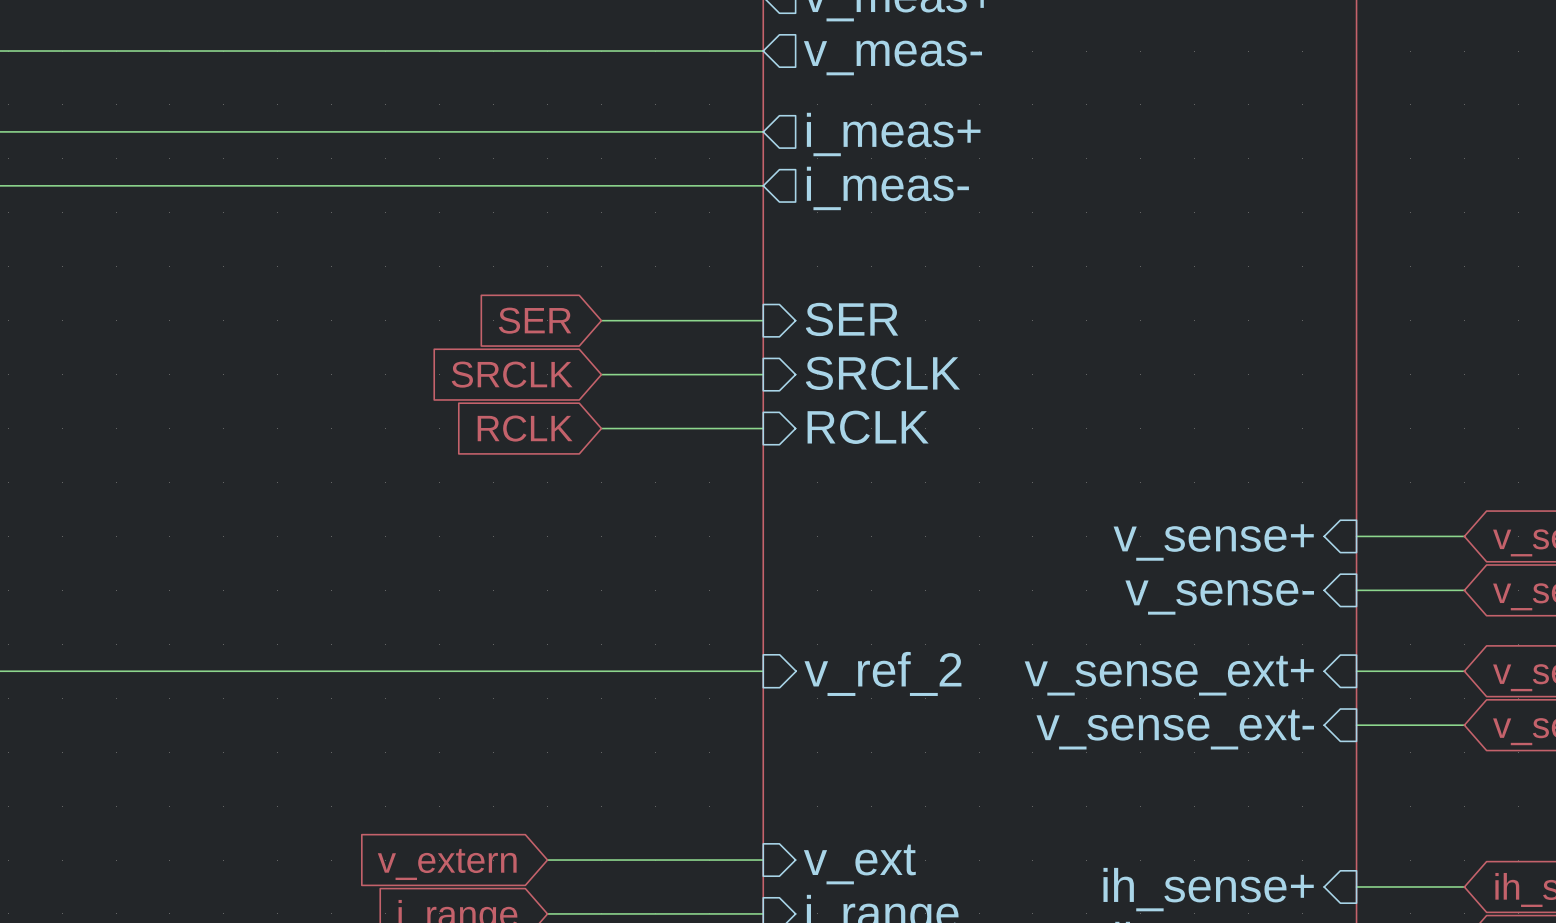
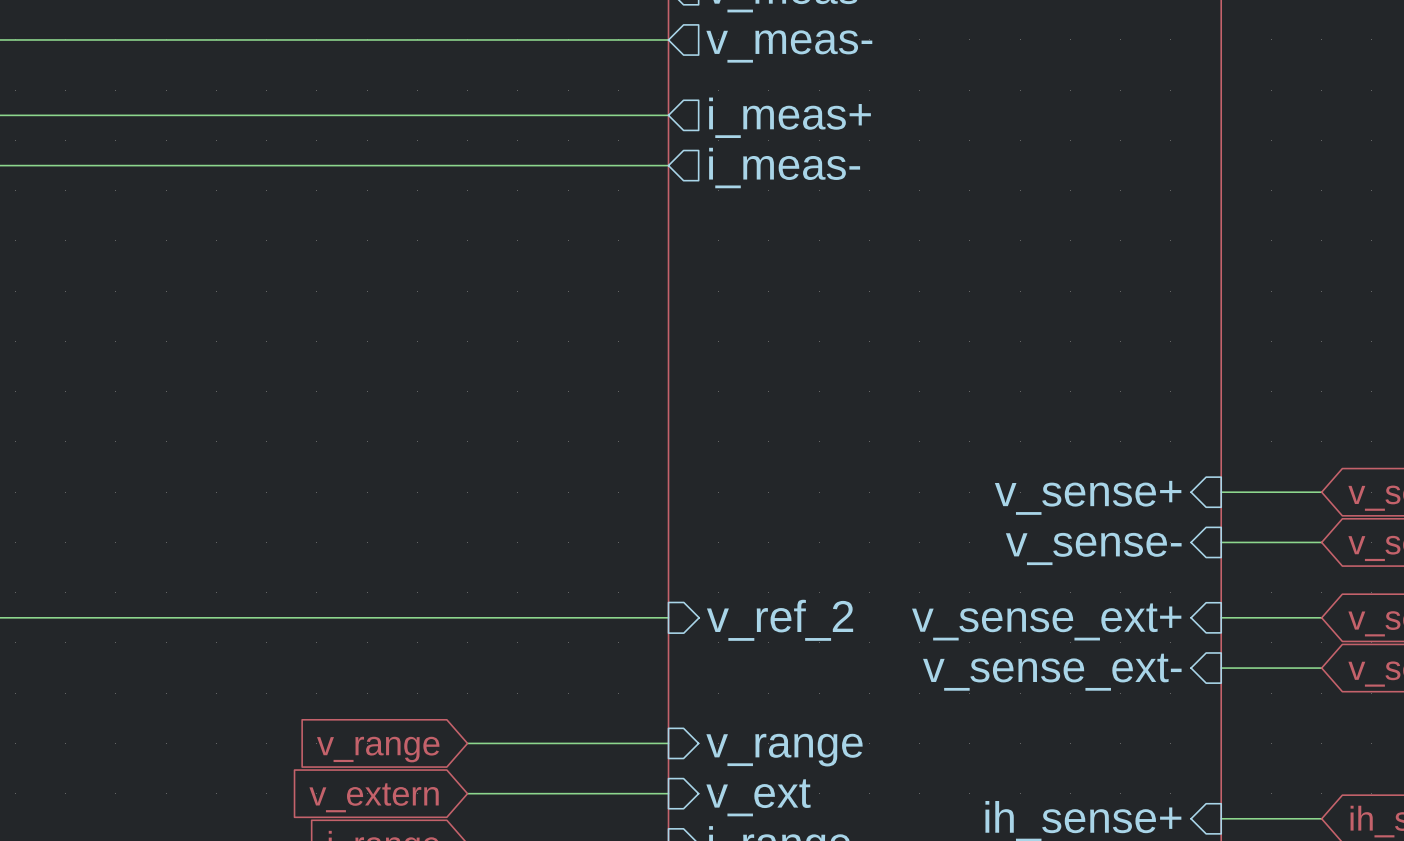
sheet pin: SER (852, 319) -> none
global label: SER (535, 320) -> none
wire: (601, 320) (763, 320) -> none
sheet pin: SRCLK (882, 373) -> none
global label: SRCLK (512, 374) -> none
wire: (601, 374) (763, 374) -> none
sheet pin: RCLK (868, 427) -> none
global label: RCLK (525, 428) -> none
wire: (601, 428) (763, 428) -> none
wire: none -> (467, 743) (668, 743)
global label: none -> v_range (378, 749)
sheet pin: none -> v_range (784, 750)

